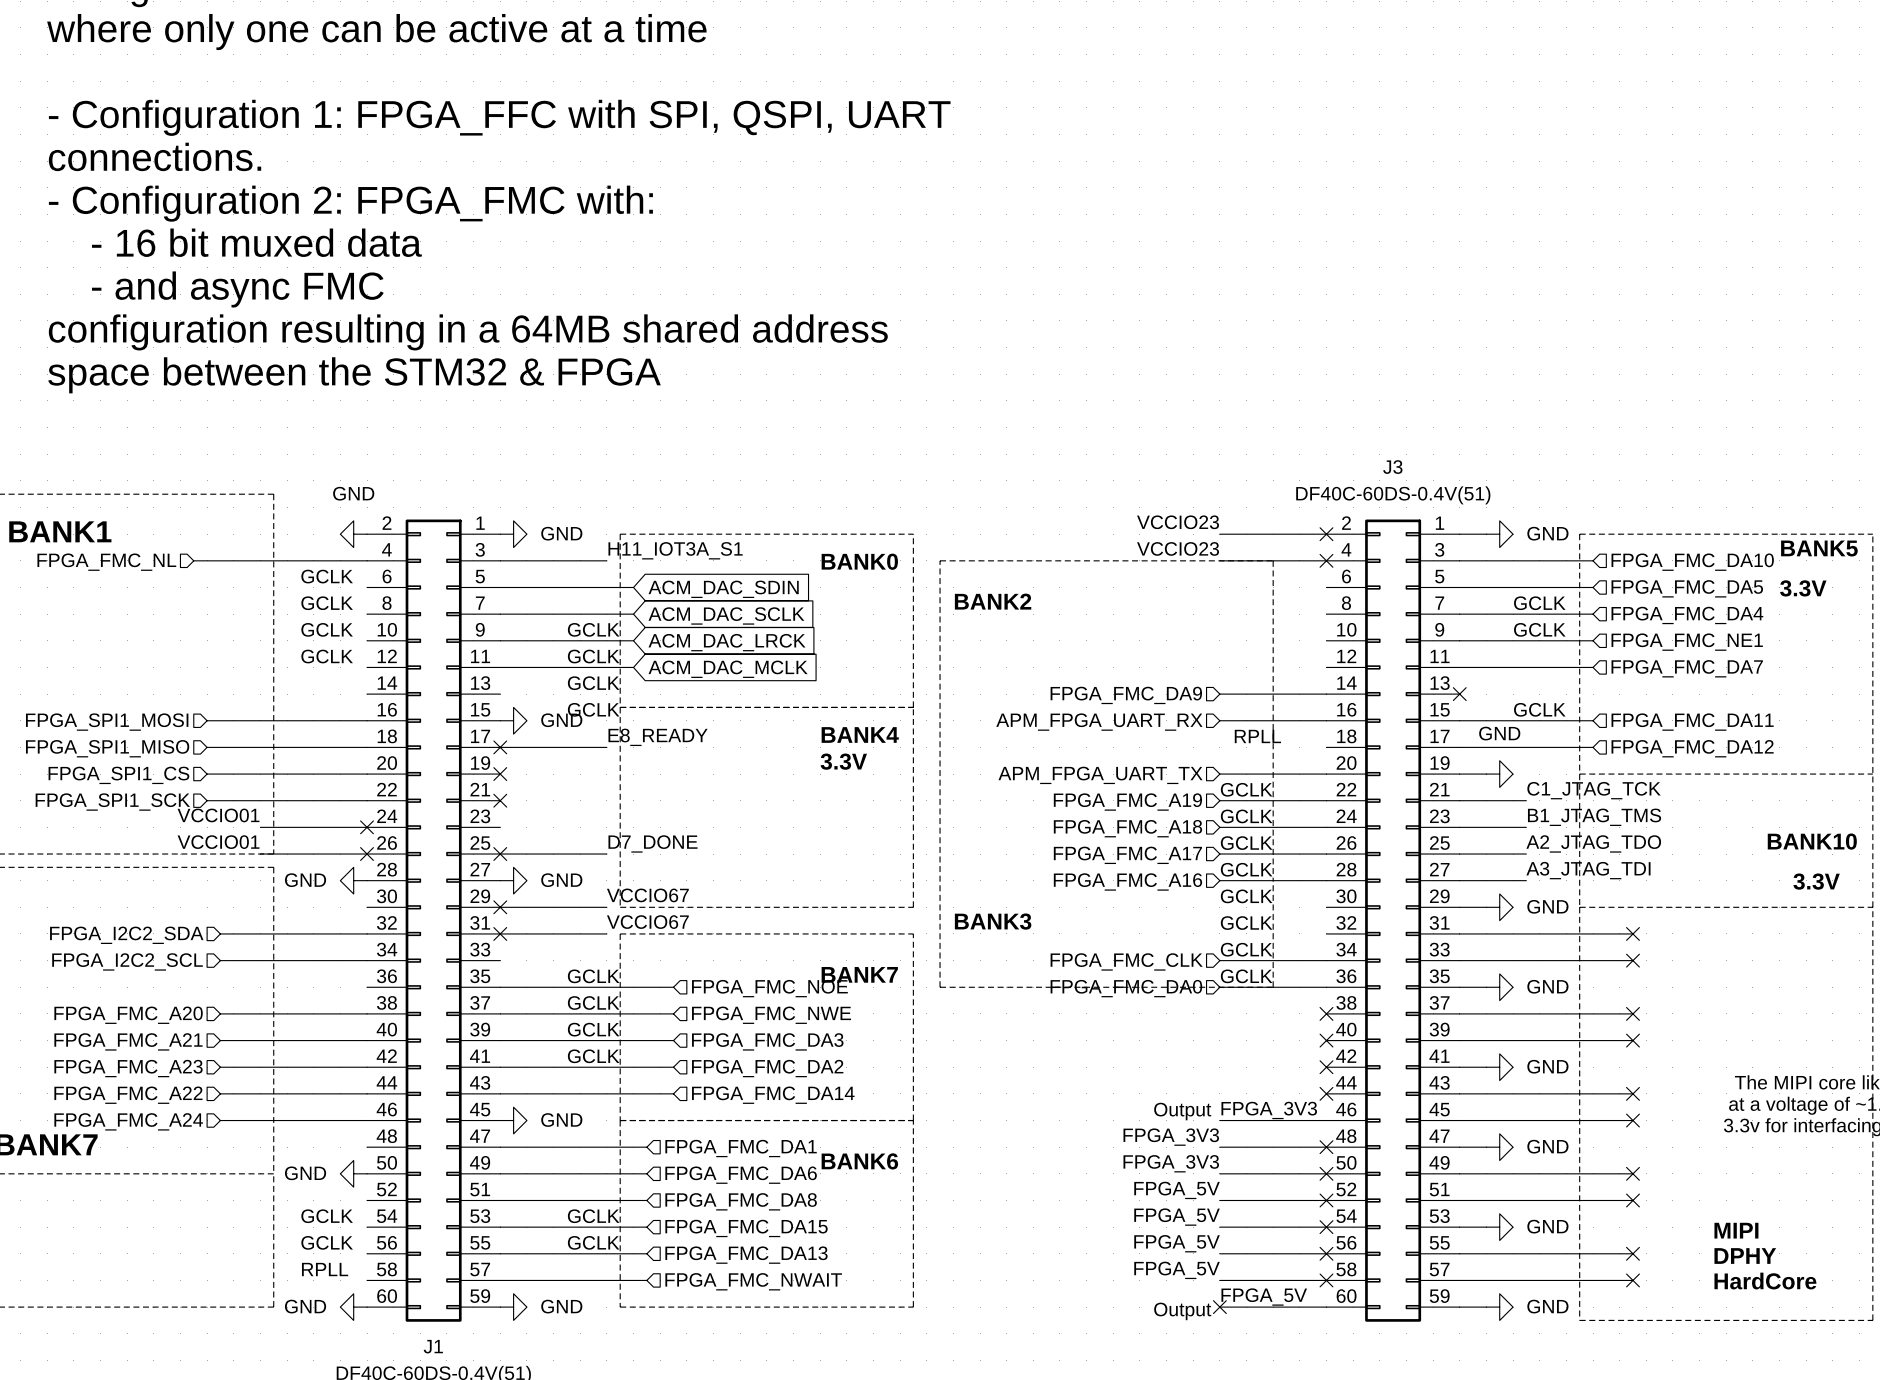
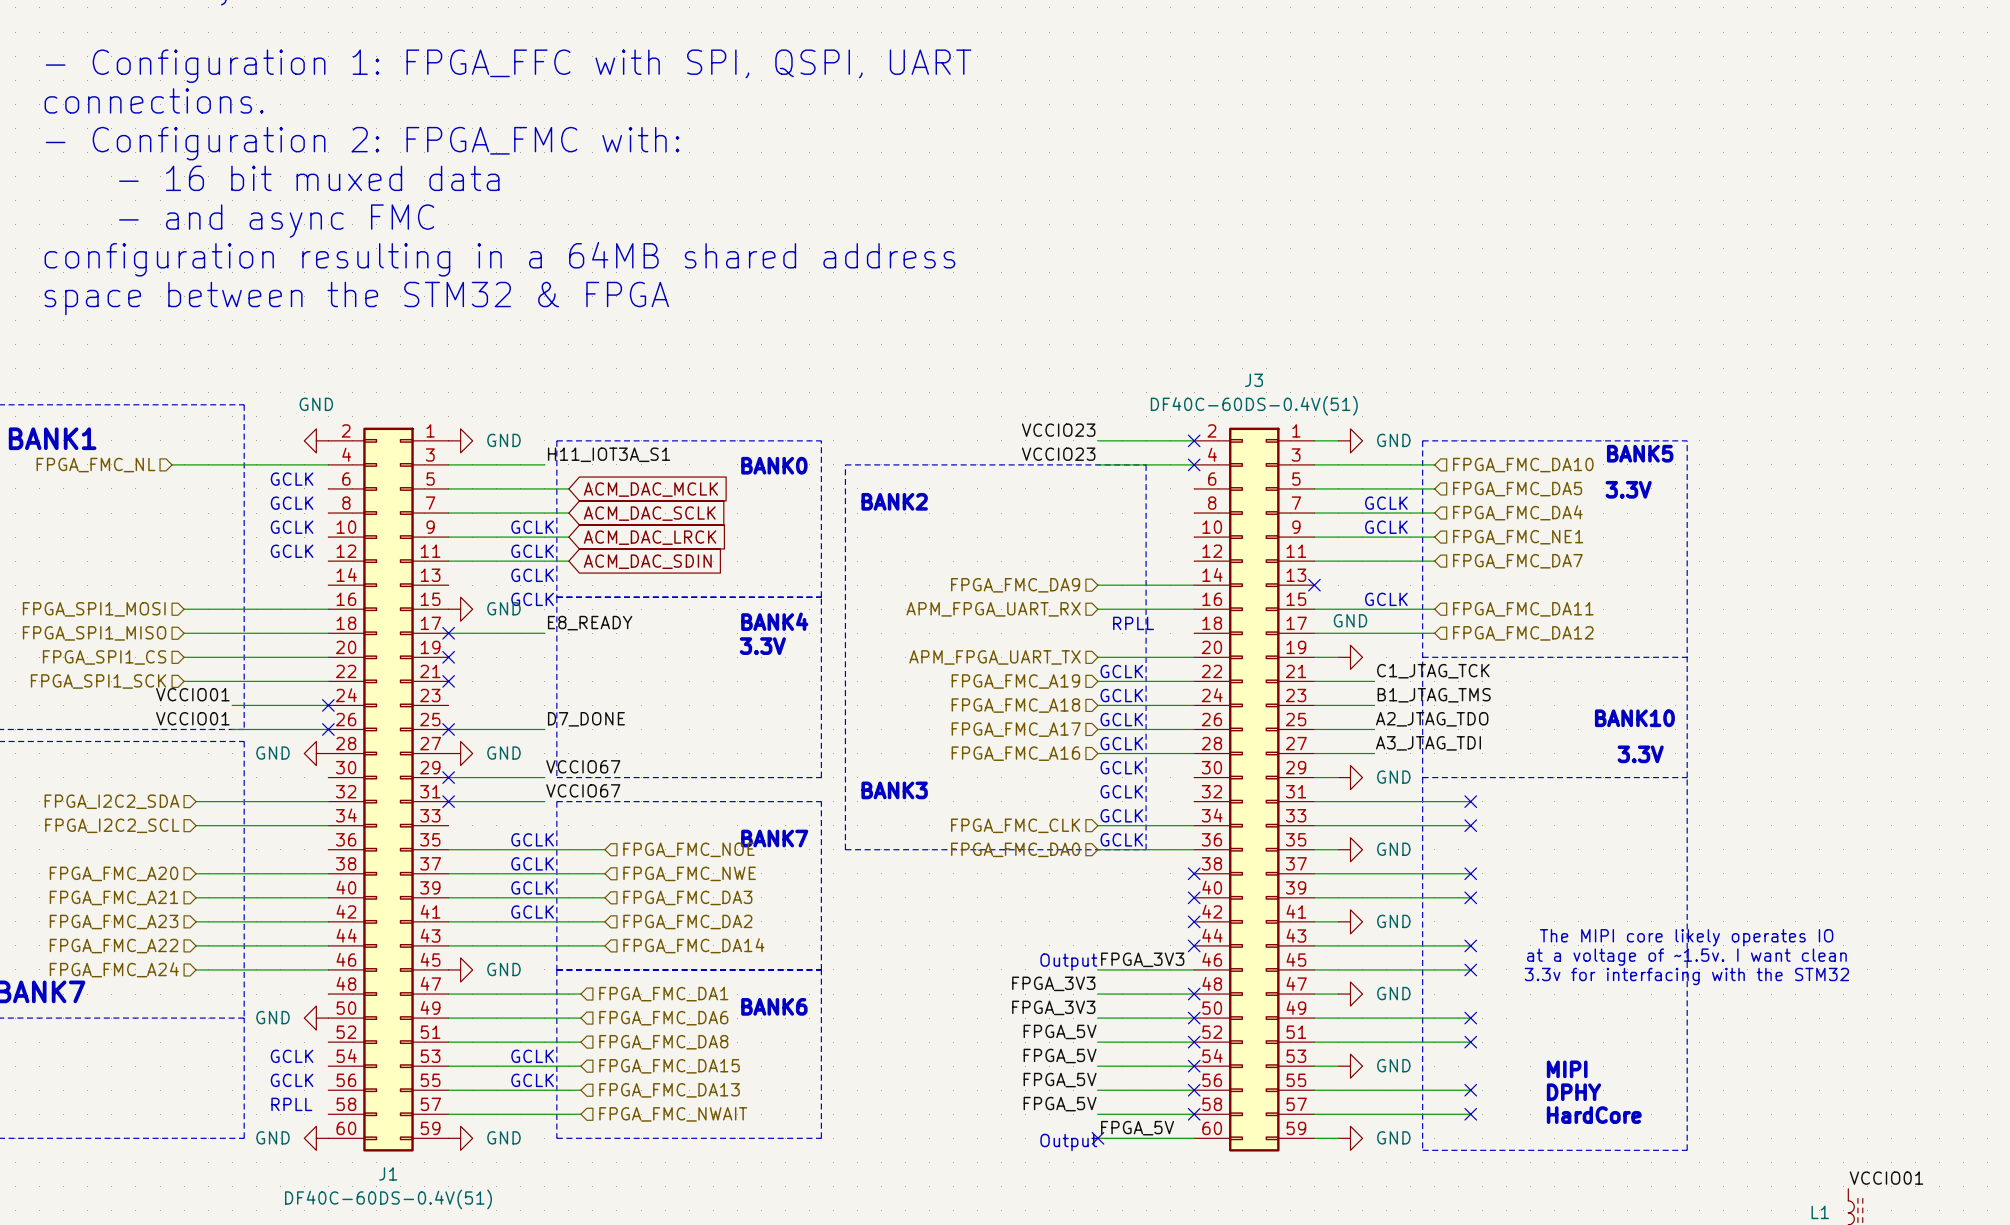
global label: ACM_DAC_SDIN (723, 589) -> ACM_DAC_MCLK (650, 489)
global label: ACM_DAC_MCLK (728, 669) -> ACM_DAC_SDIN (647, 561)

